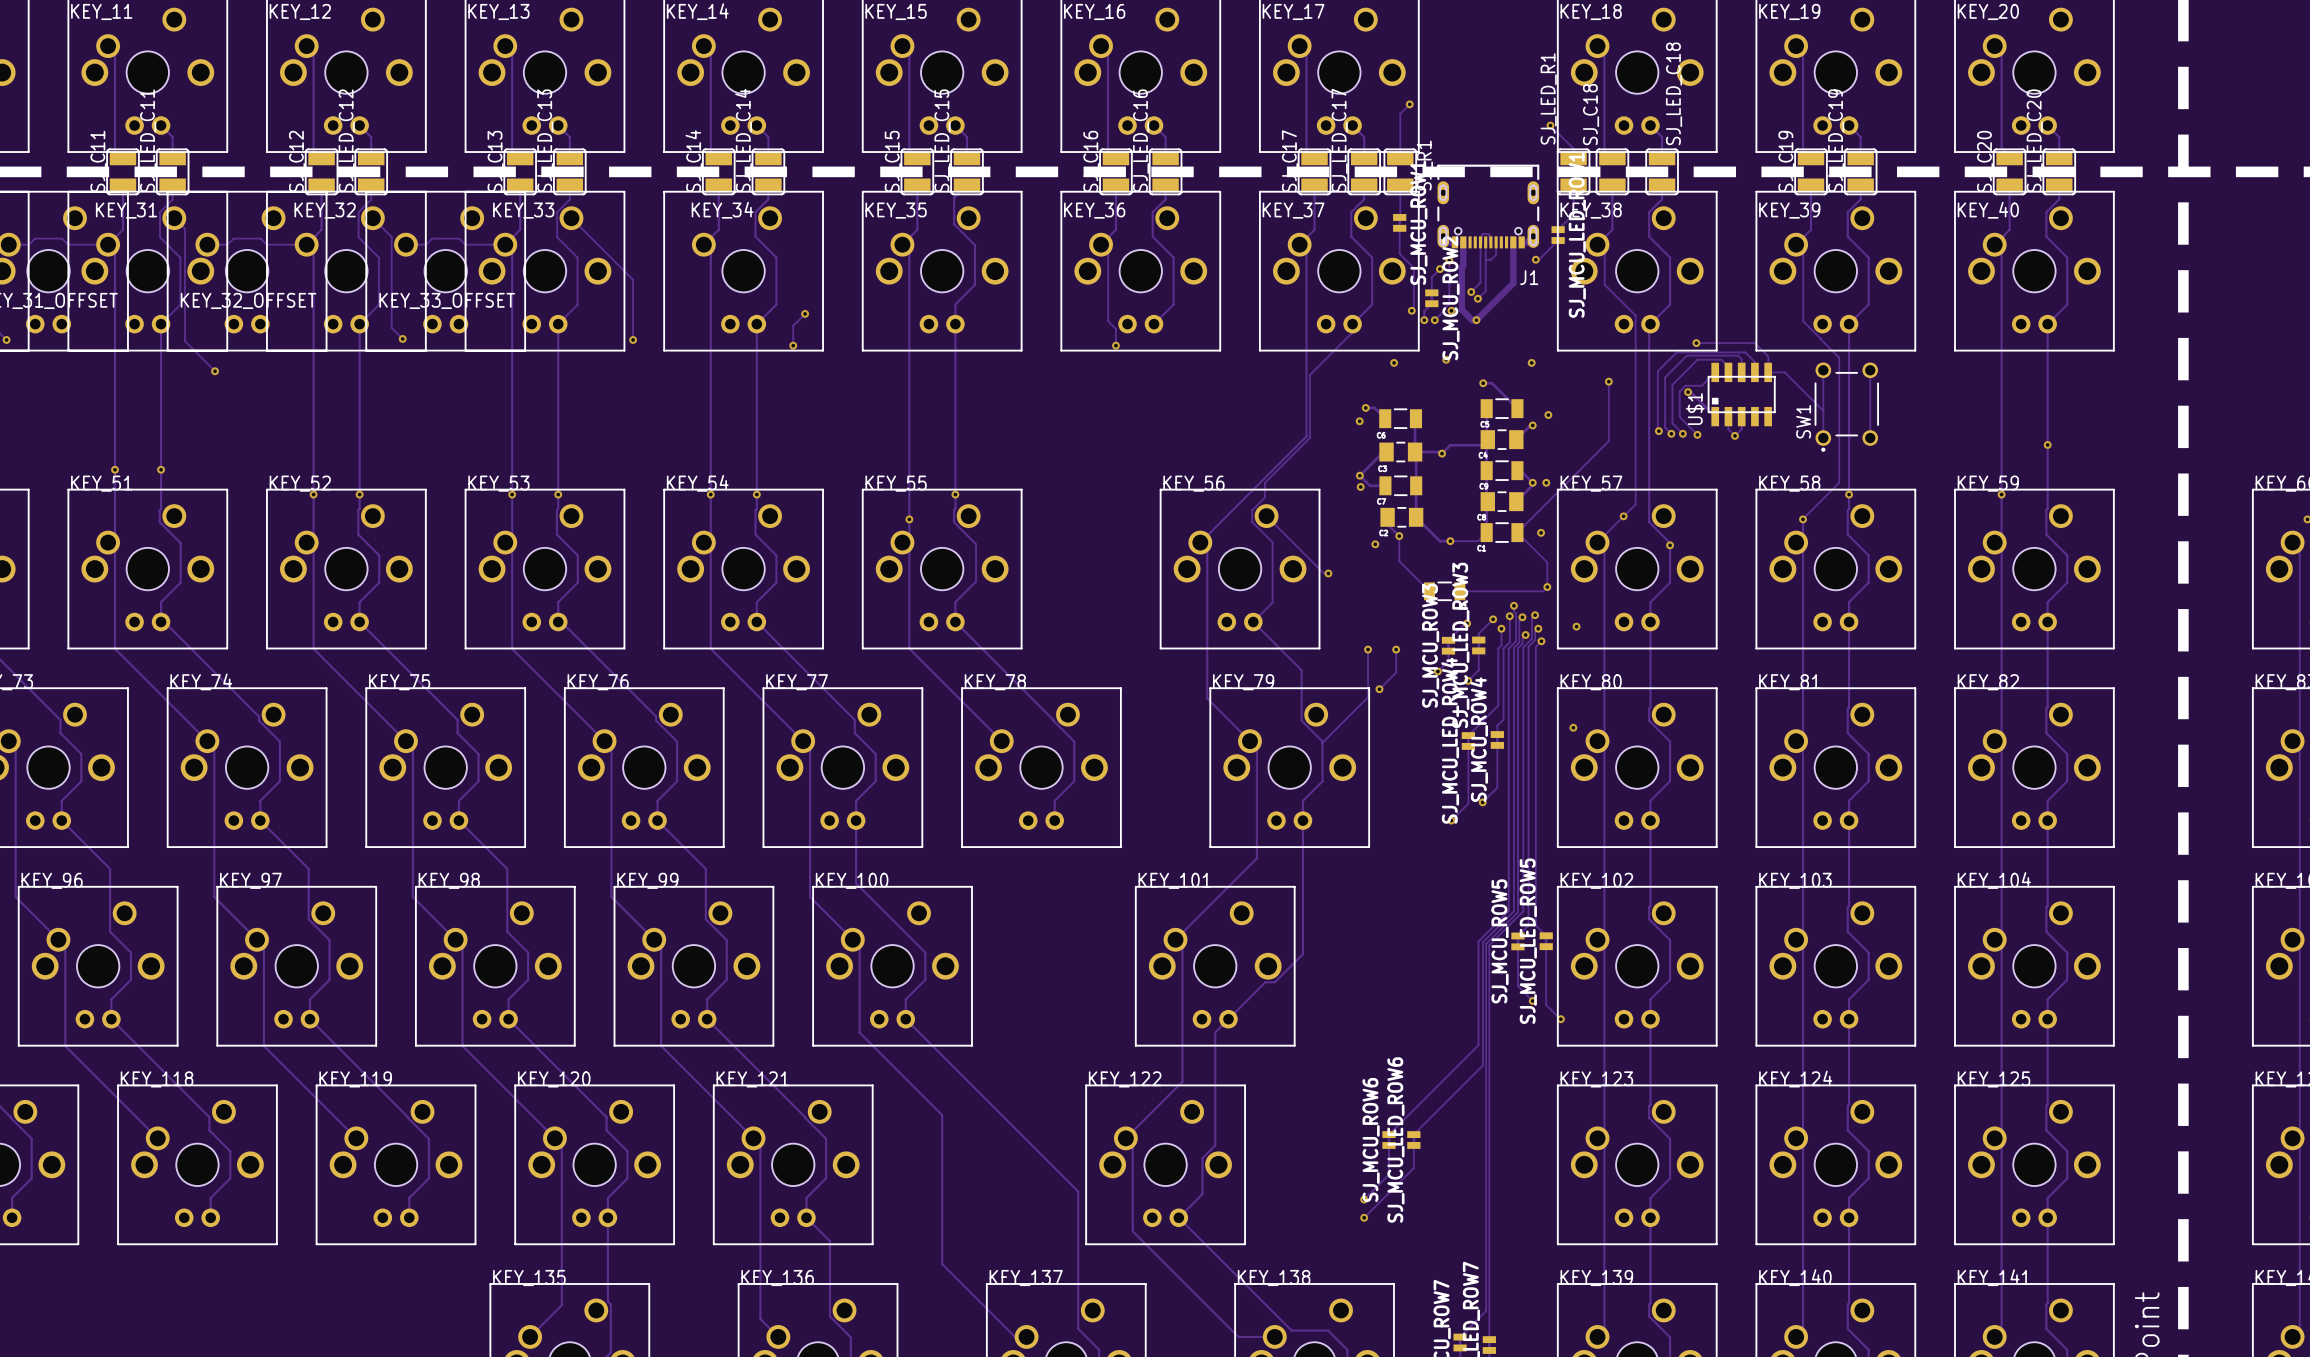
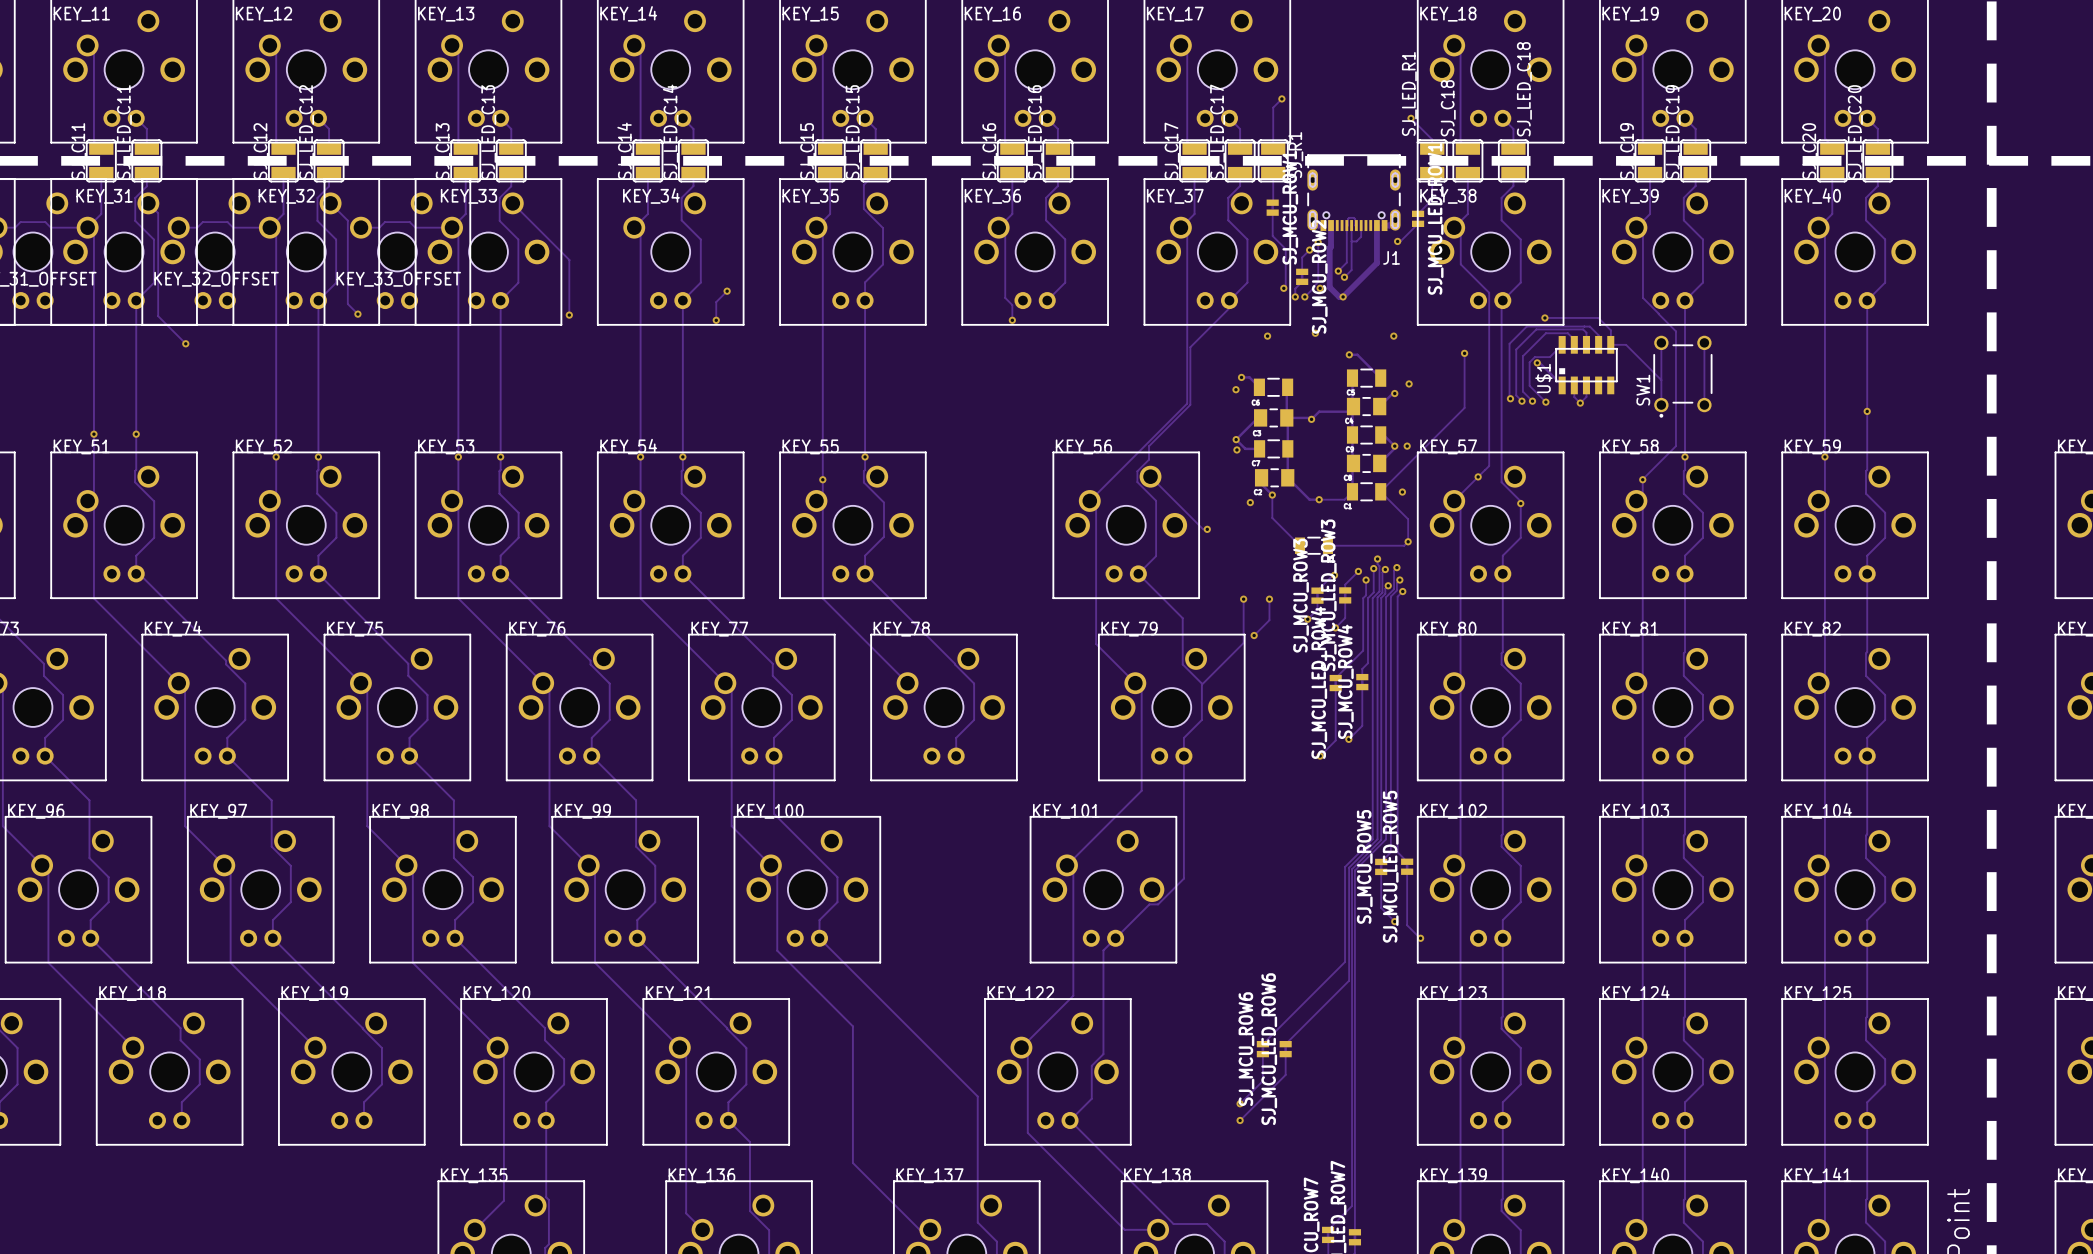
via: (1576, 626) -> none
via: (1573, 727) -> none

